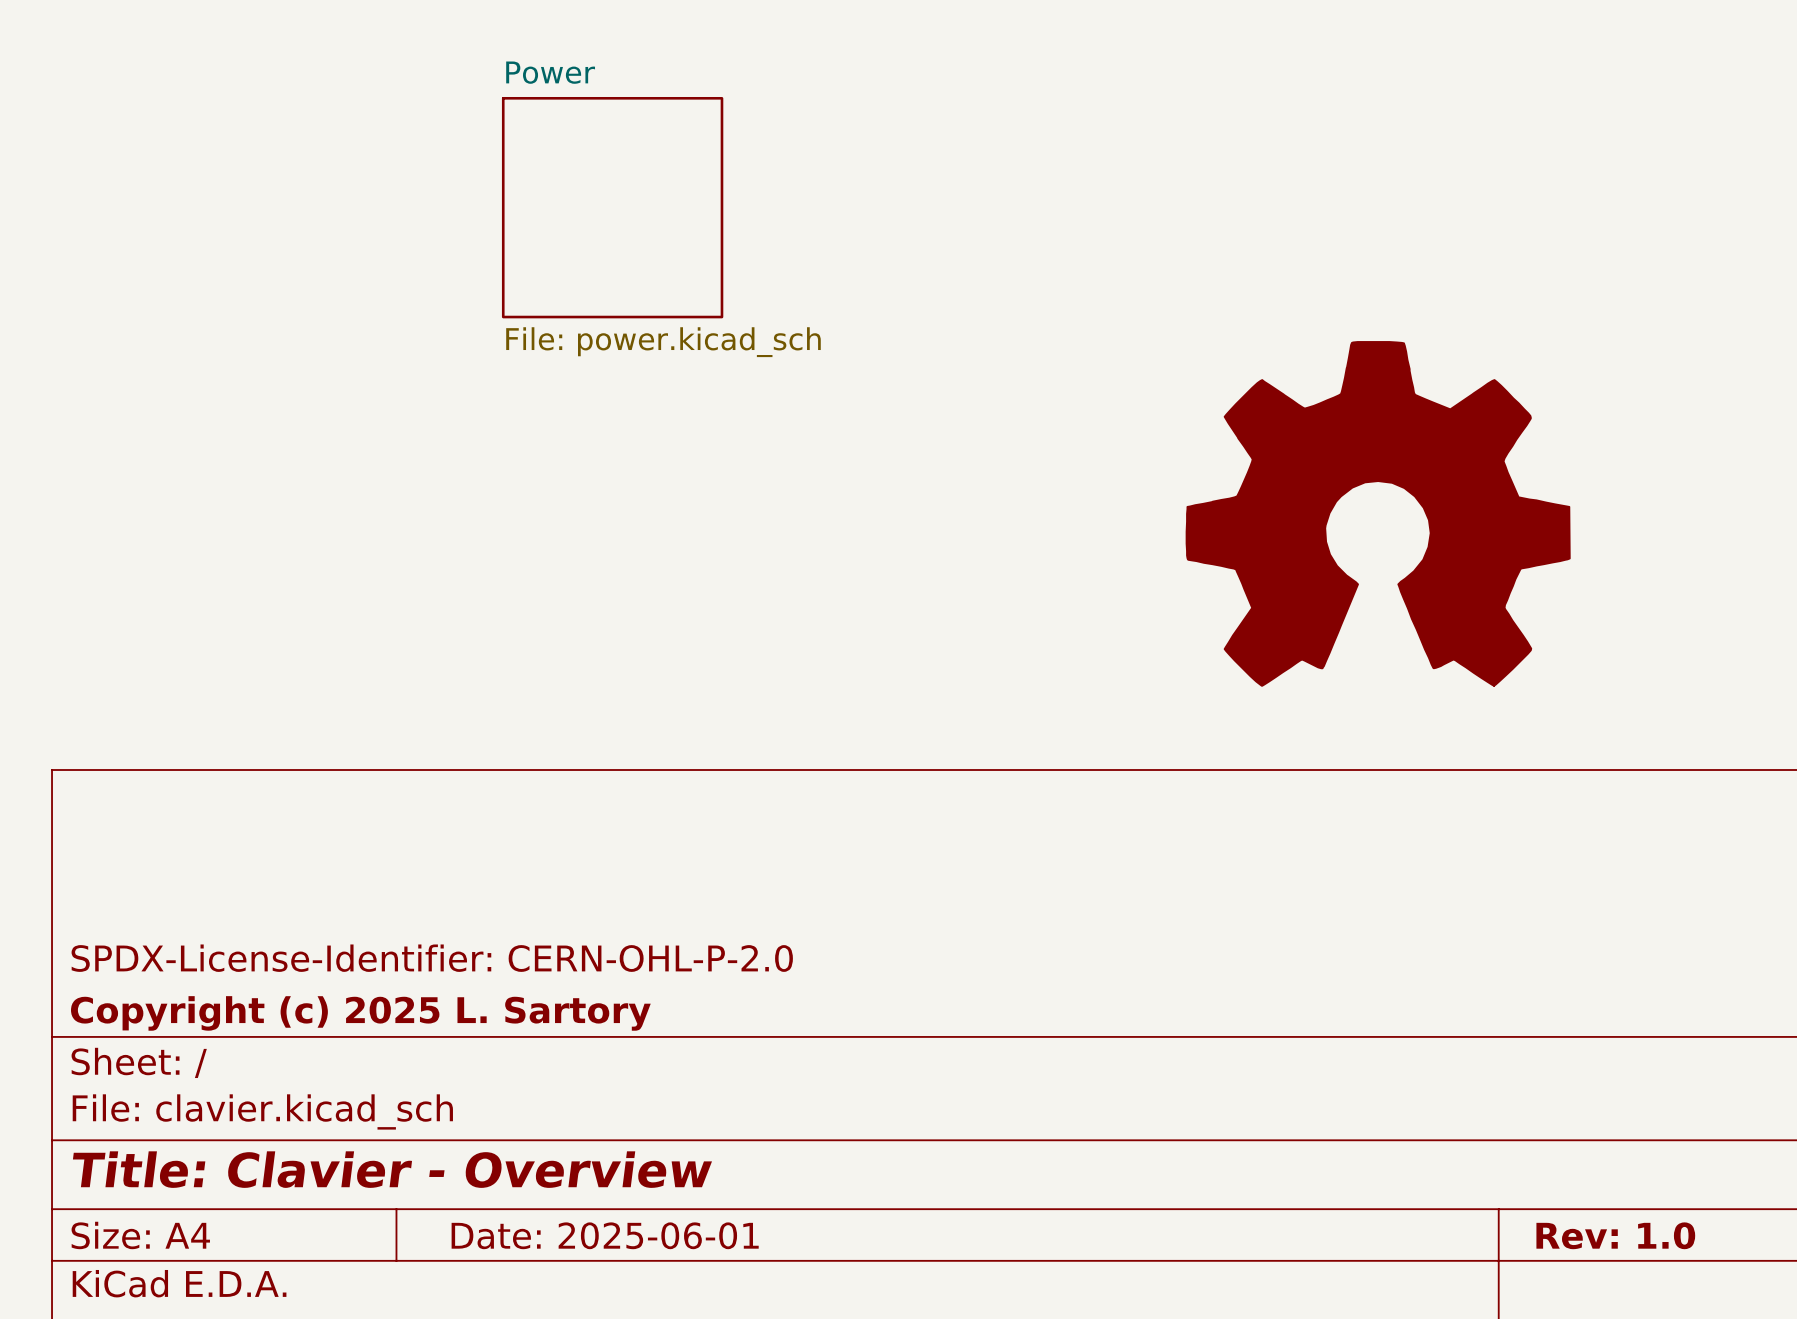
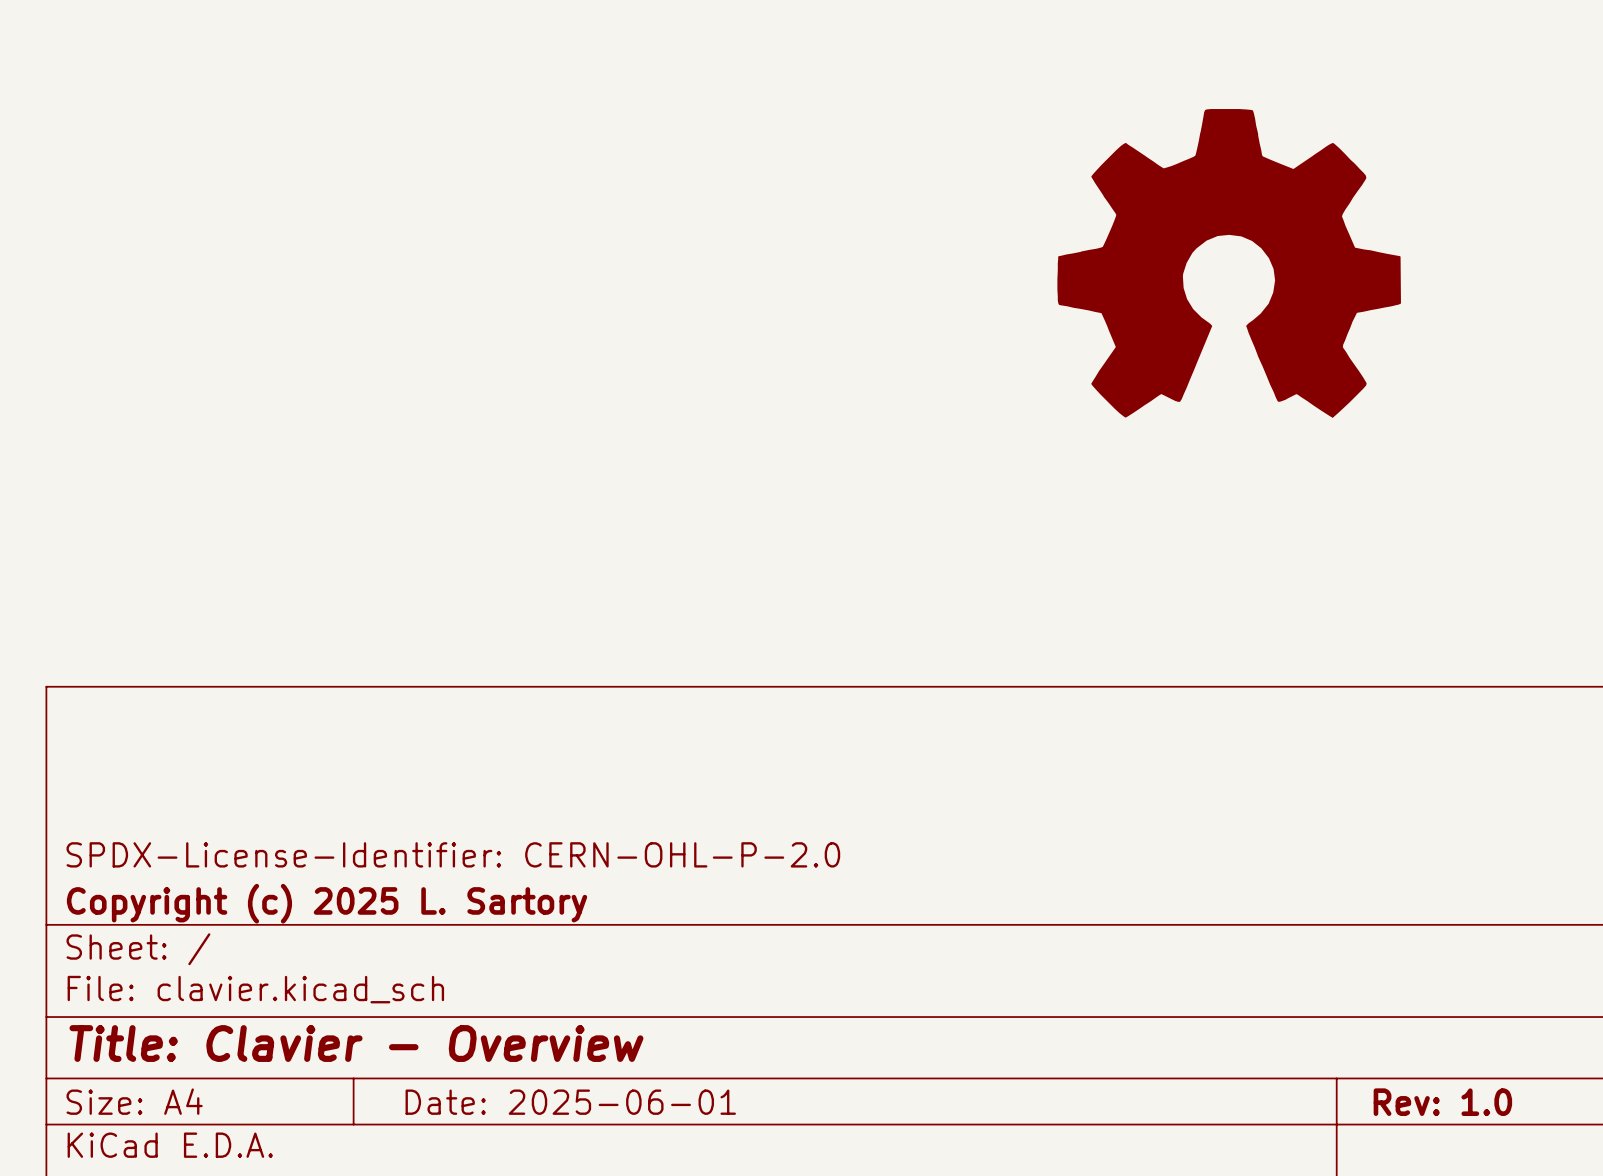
sheet Power: File: power.kicad_sch (612, 207) -> none
power symbol position: (1378, 513) -> (1229, 263)

